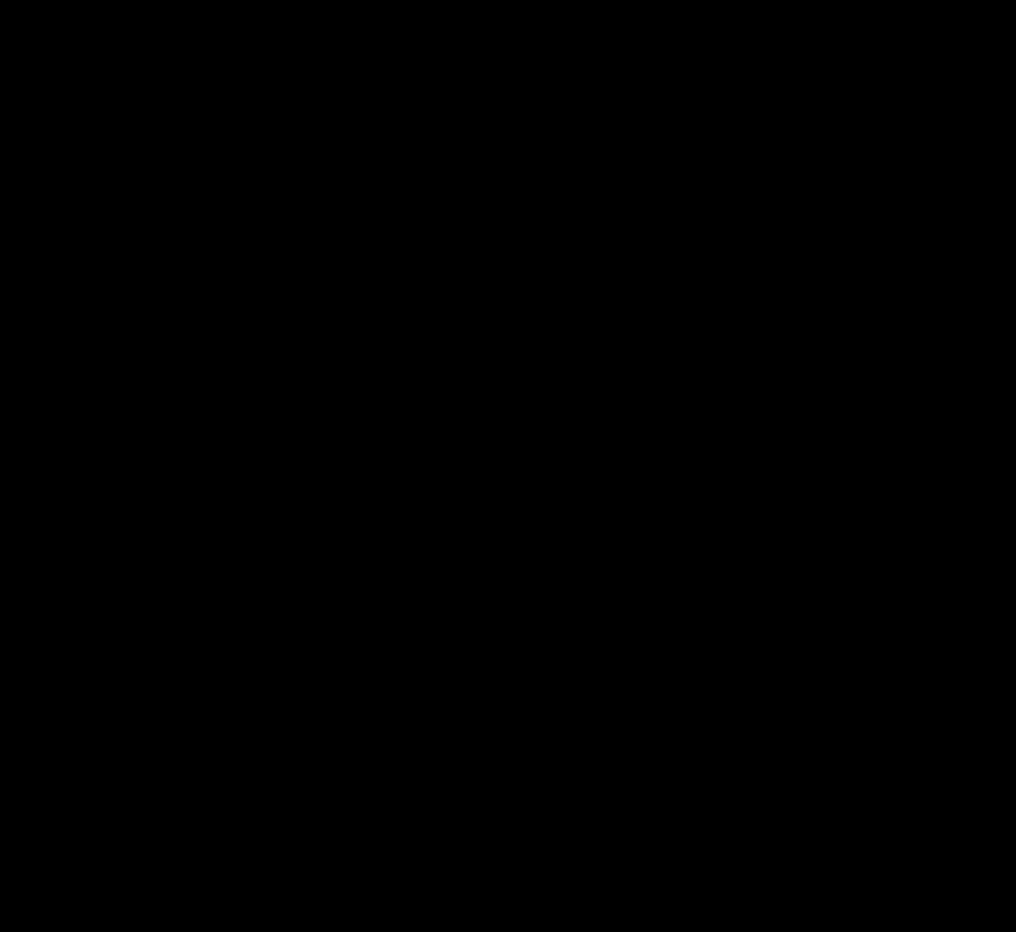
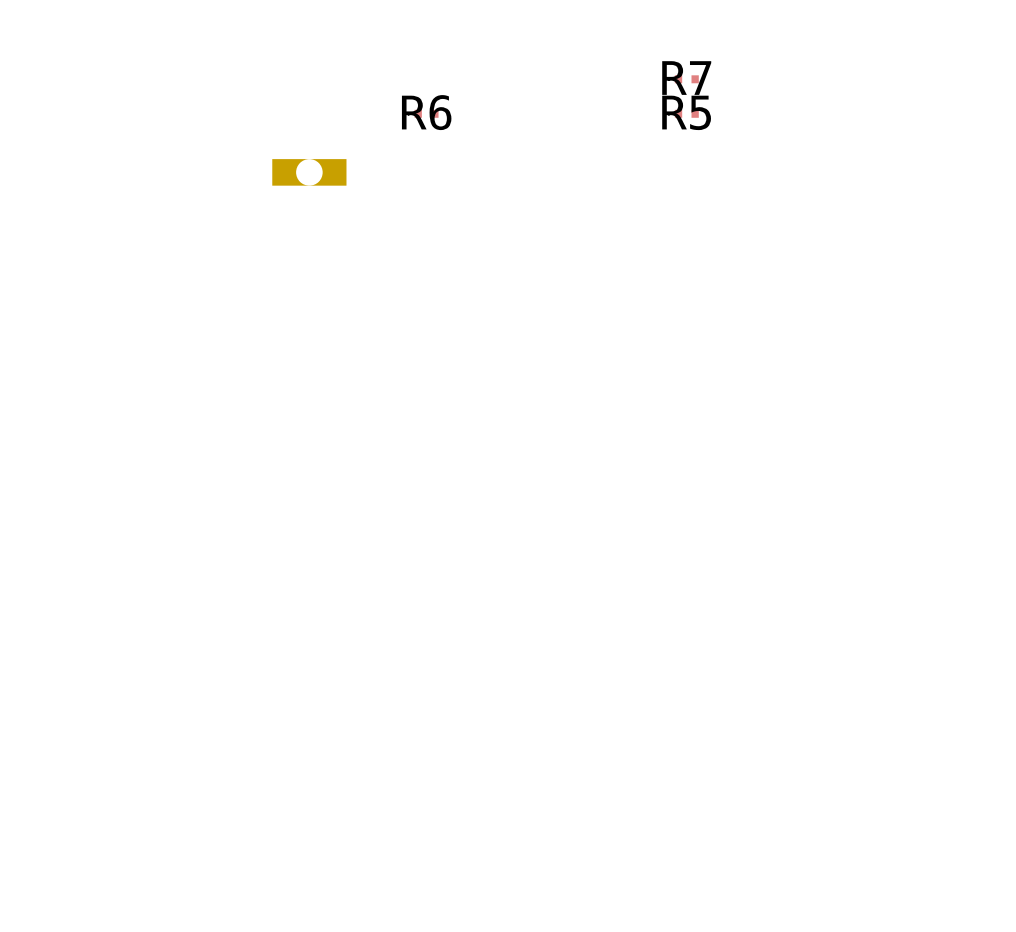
R7: none -> (683, 79)
R6: none -> (422, 113)
R5: none -> (683, 113)
part: none -> (309, 172)

